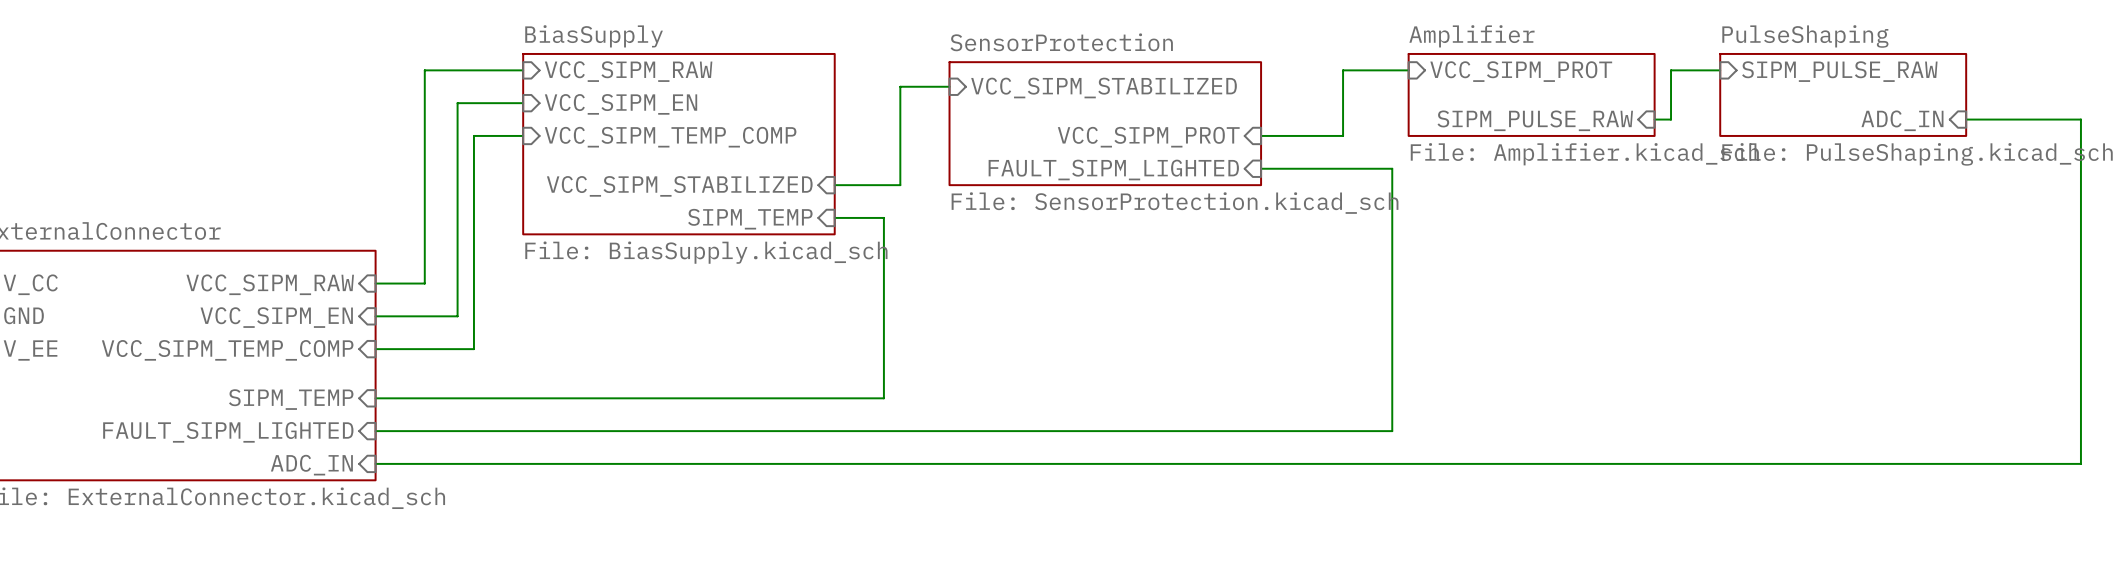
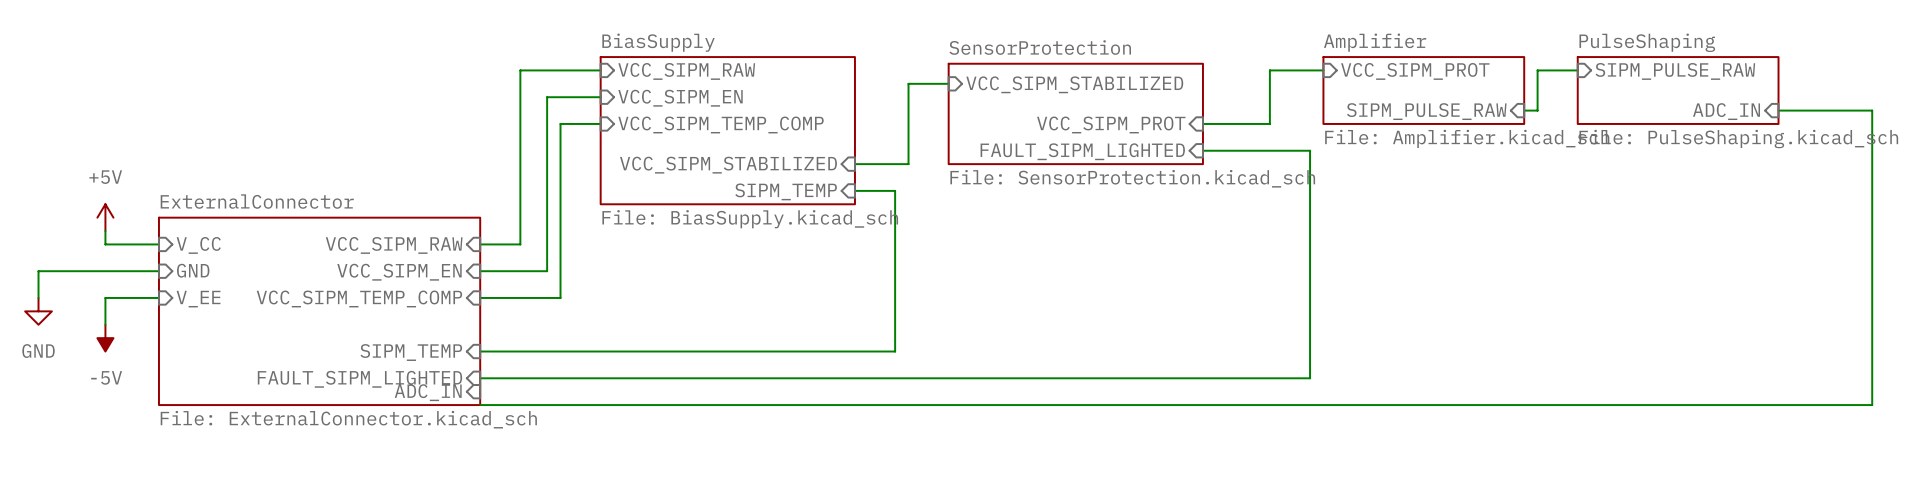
wire: (375, 398) (883, 398) -> (480, 351) (895, 351) (895, 338)
sheet pin position: SIPM_TEMP (291, 399) -> SIPM_TEMP (411, 352)
wire: (375, 431) (1392, 431) -> (480, 378) (1310, 378) (1310, 364)
sheet pin position: FAULT_SIPM_LIGHTED (228, 432) -> FAULT_SIPM_LIGHTED (359, 379)
wire: (375, 463) (2080, 463) -> (480, 405) (1872, 405) (1872, 391)

